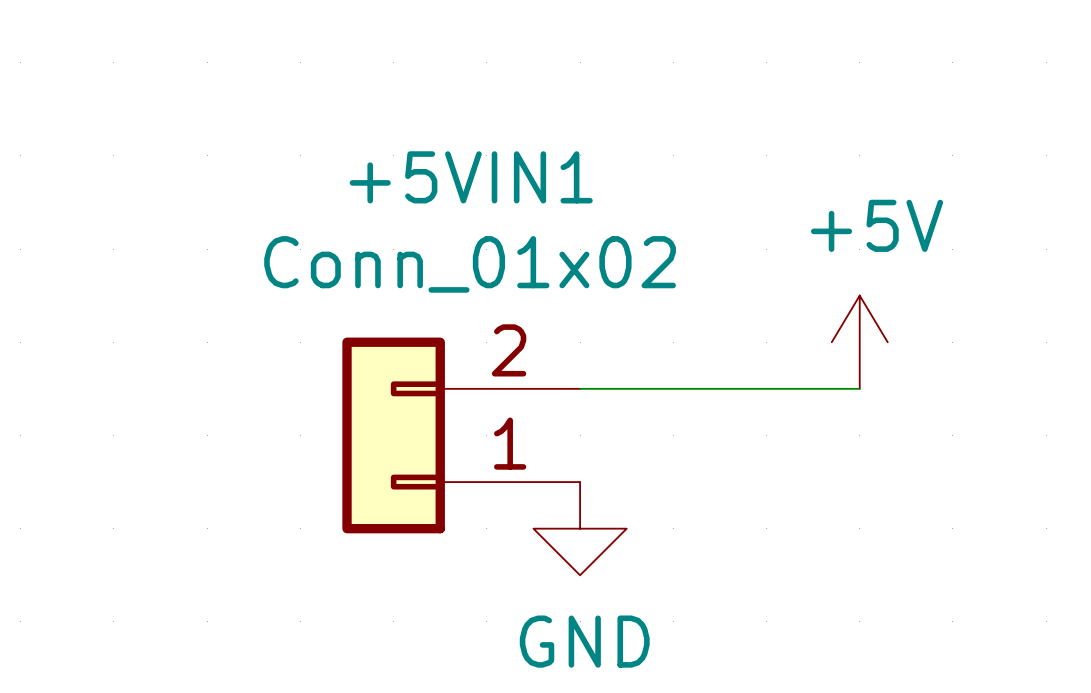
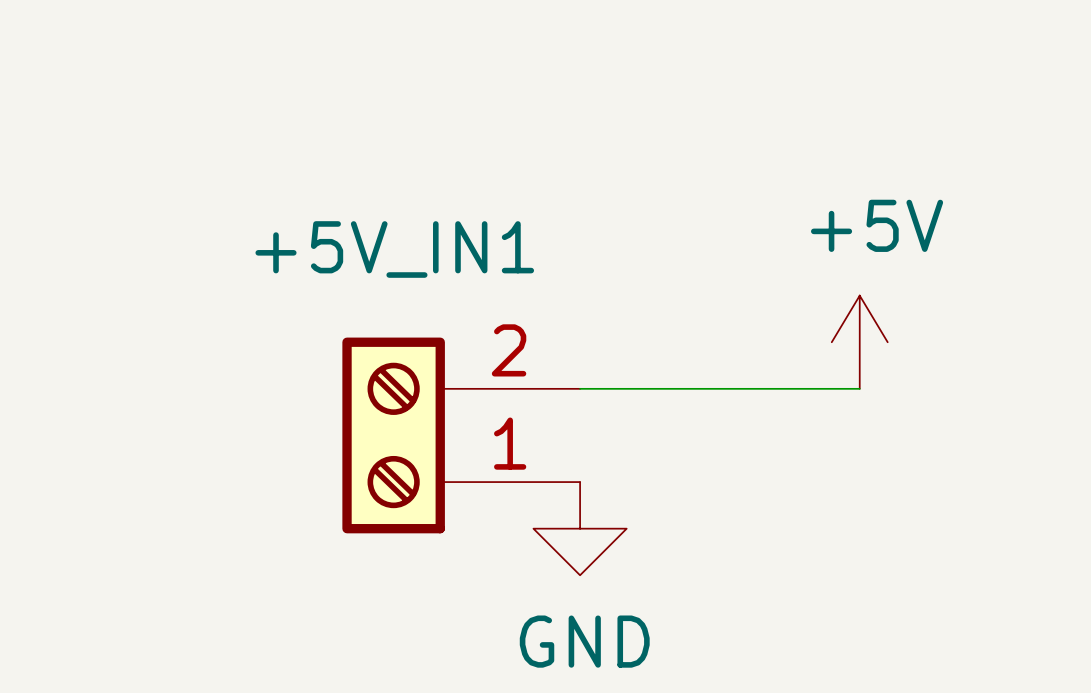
+5VIN1: Conn_01x02 (461, 435) -> none
+5V_IN1: none -> (461, 435)

